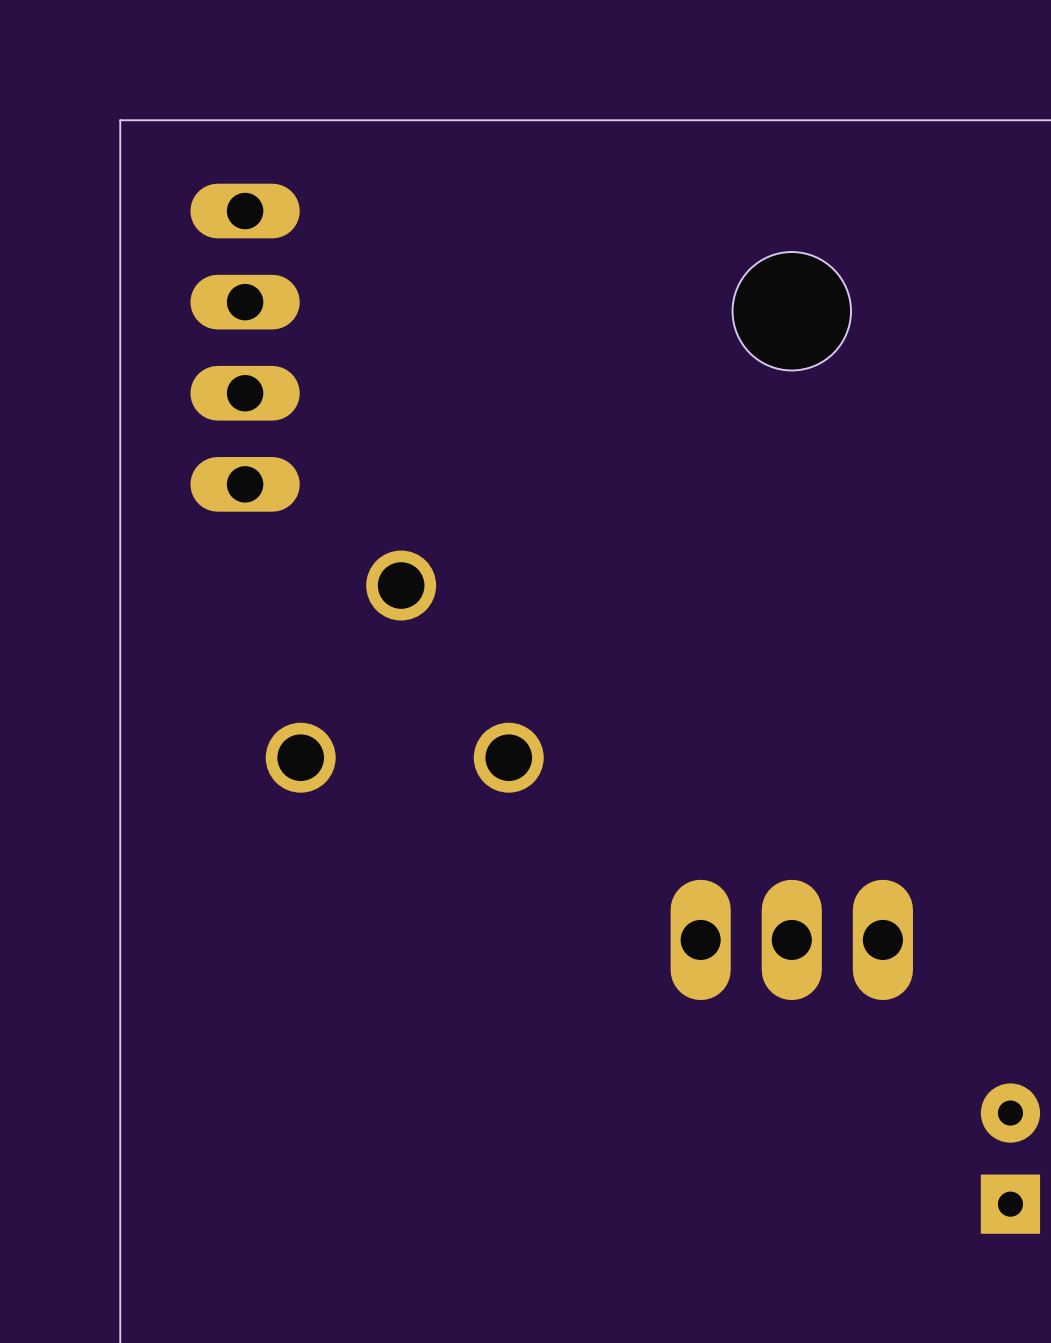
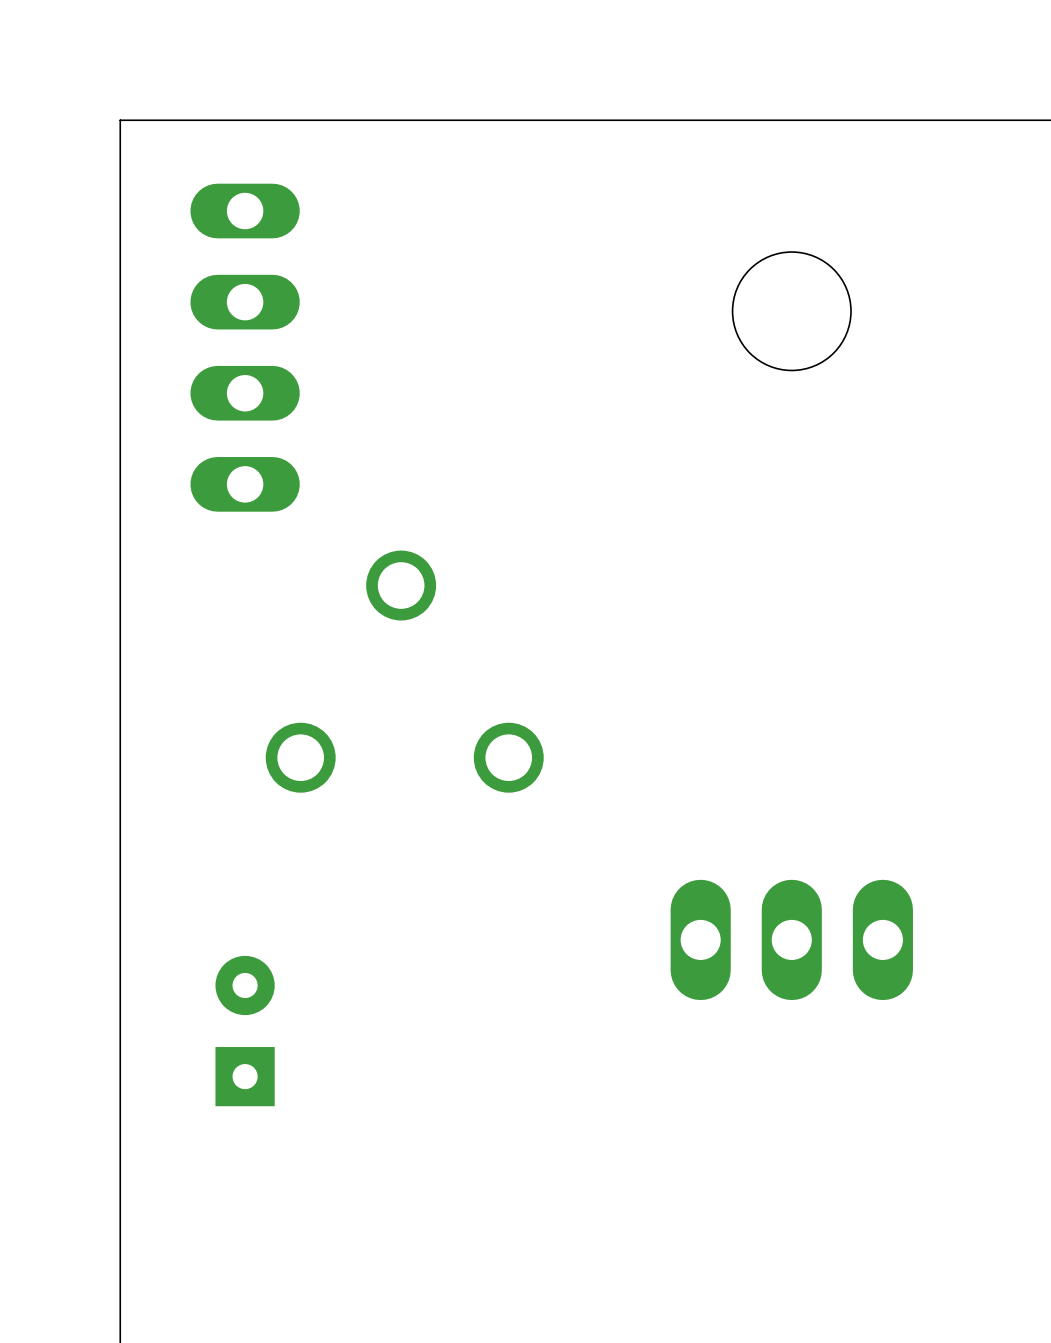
part position: (1010, 1158) -> (245, 1031)

